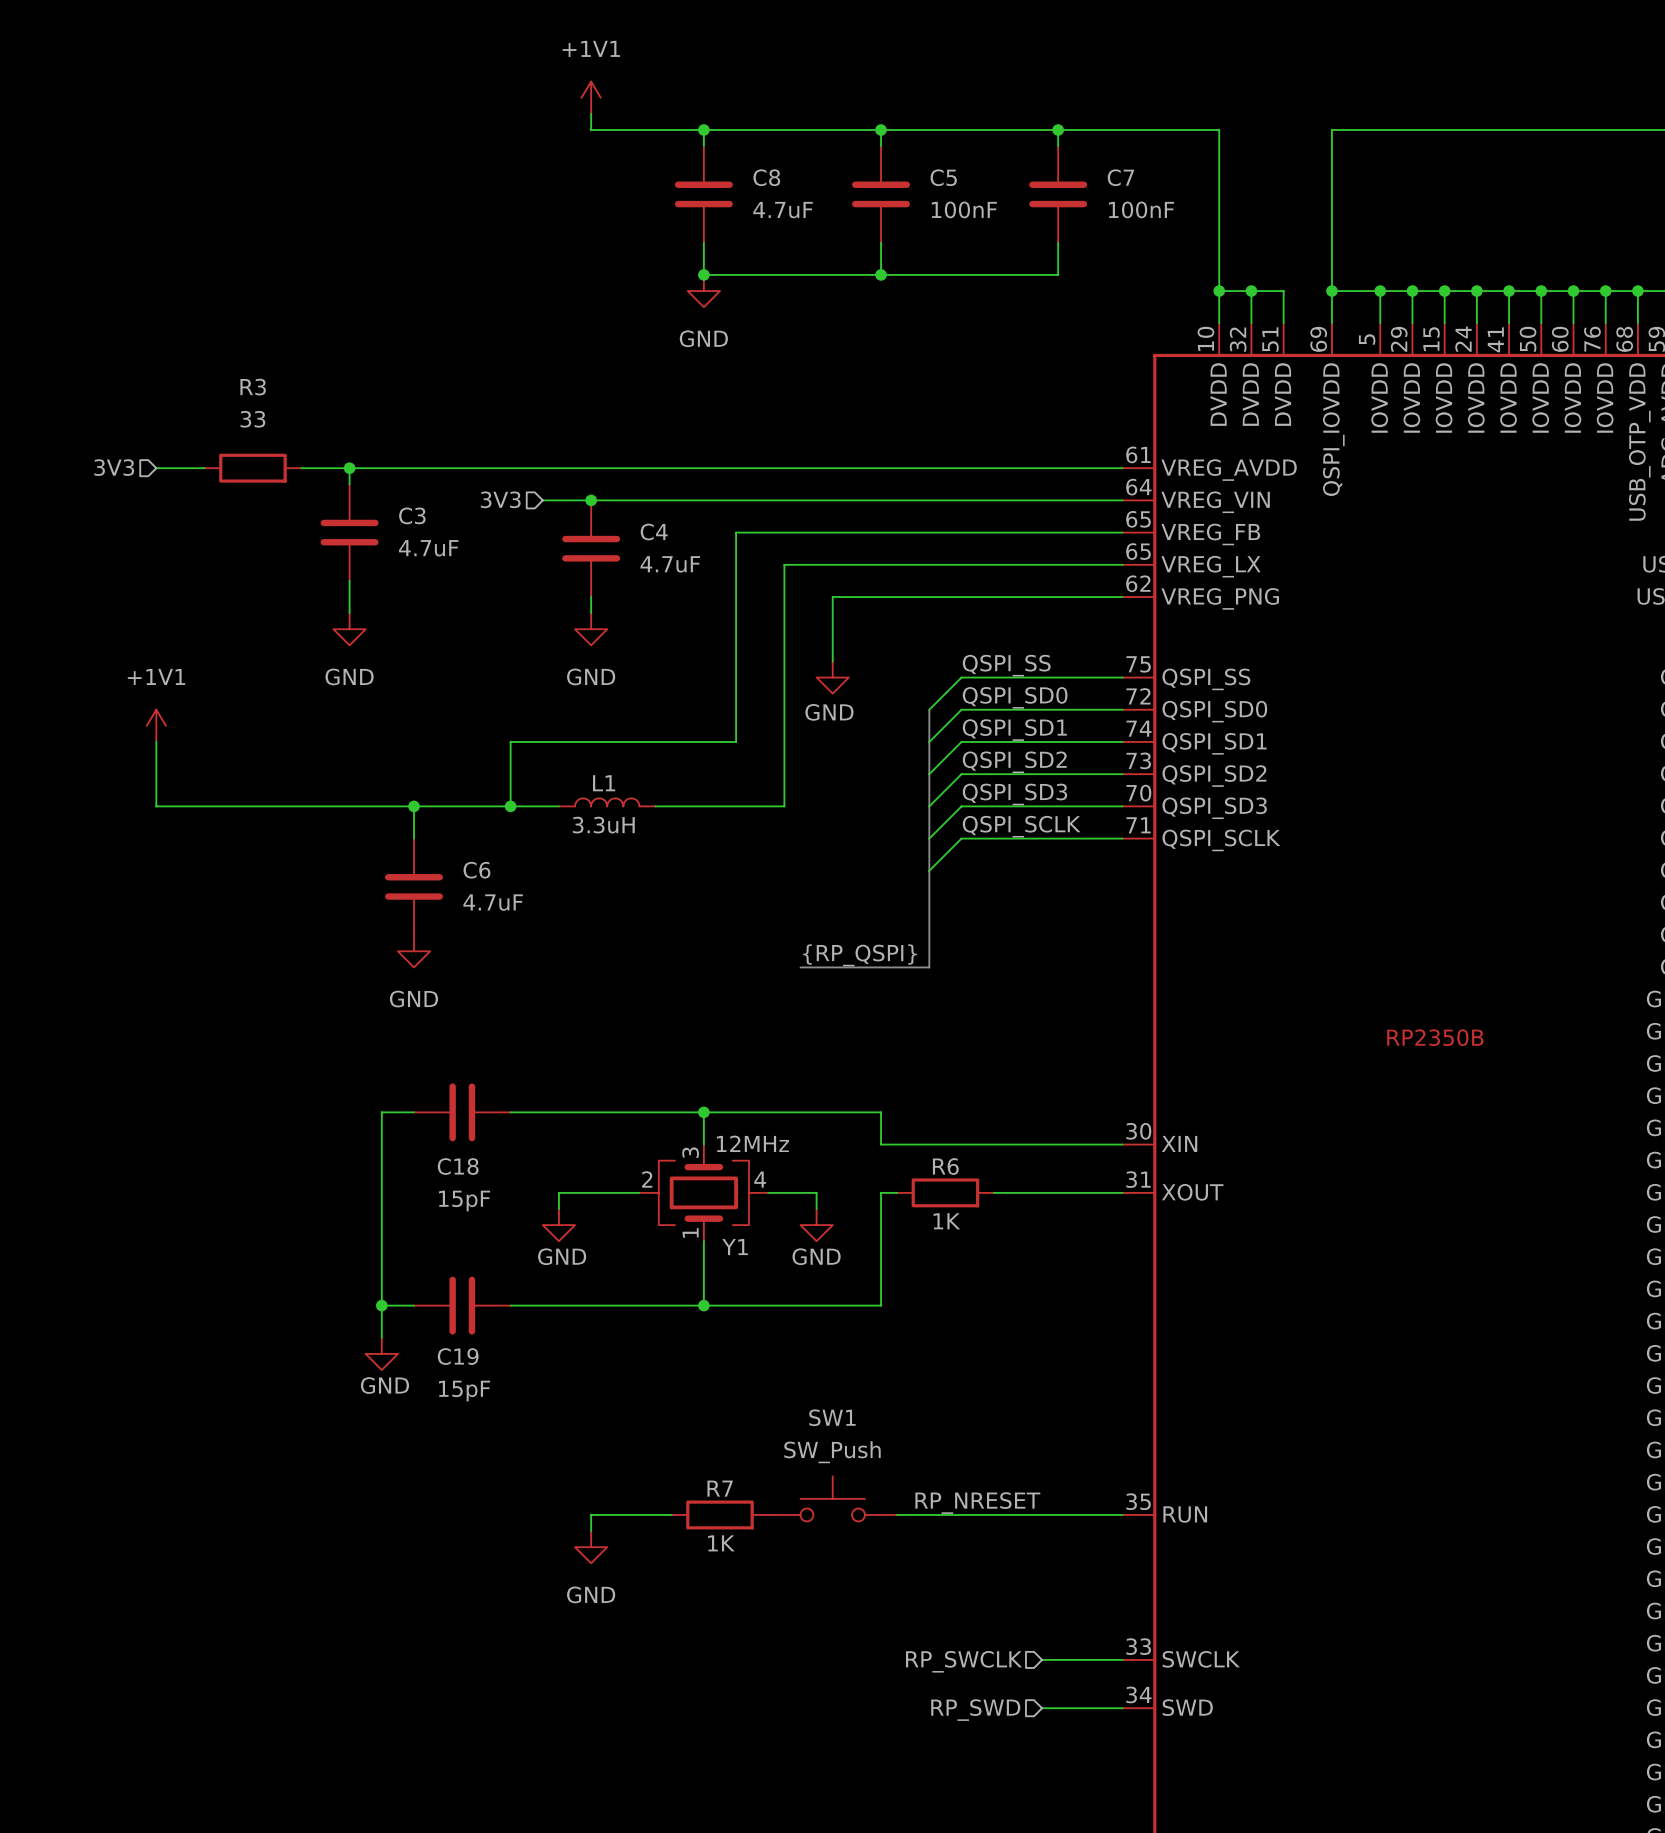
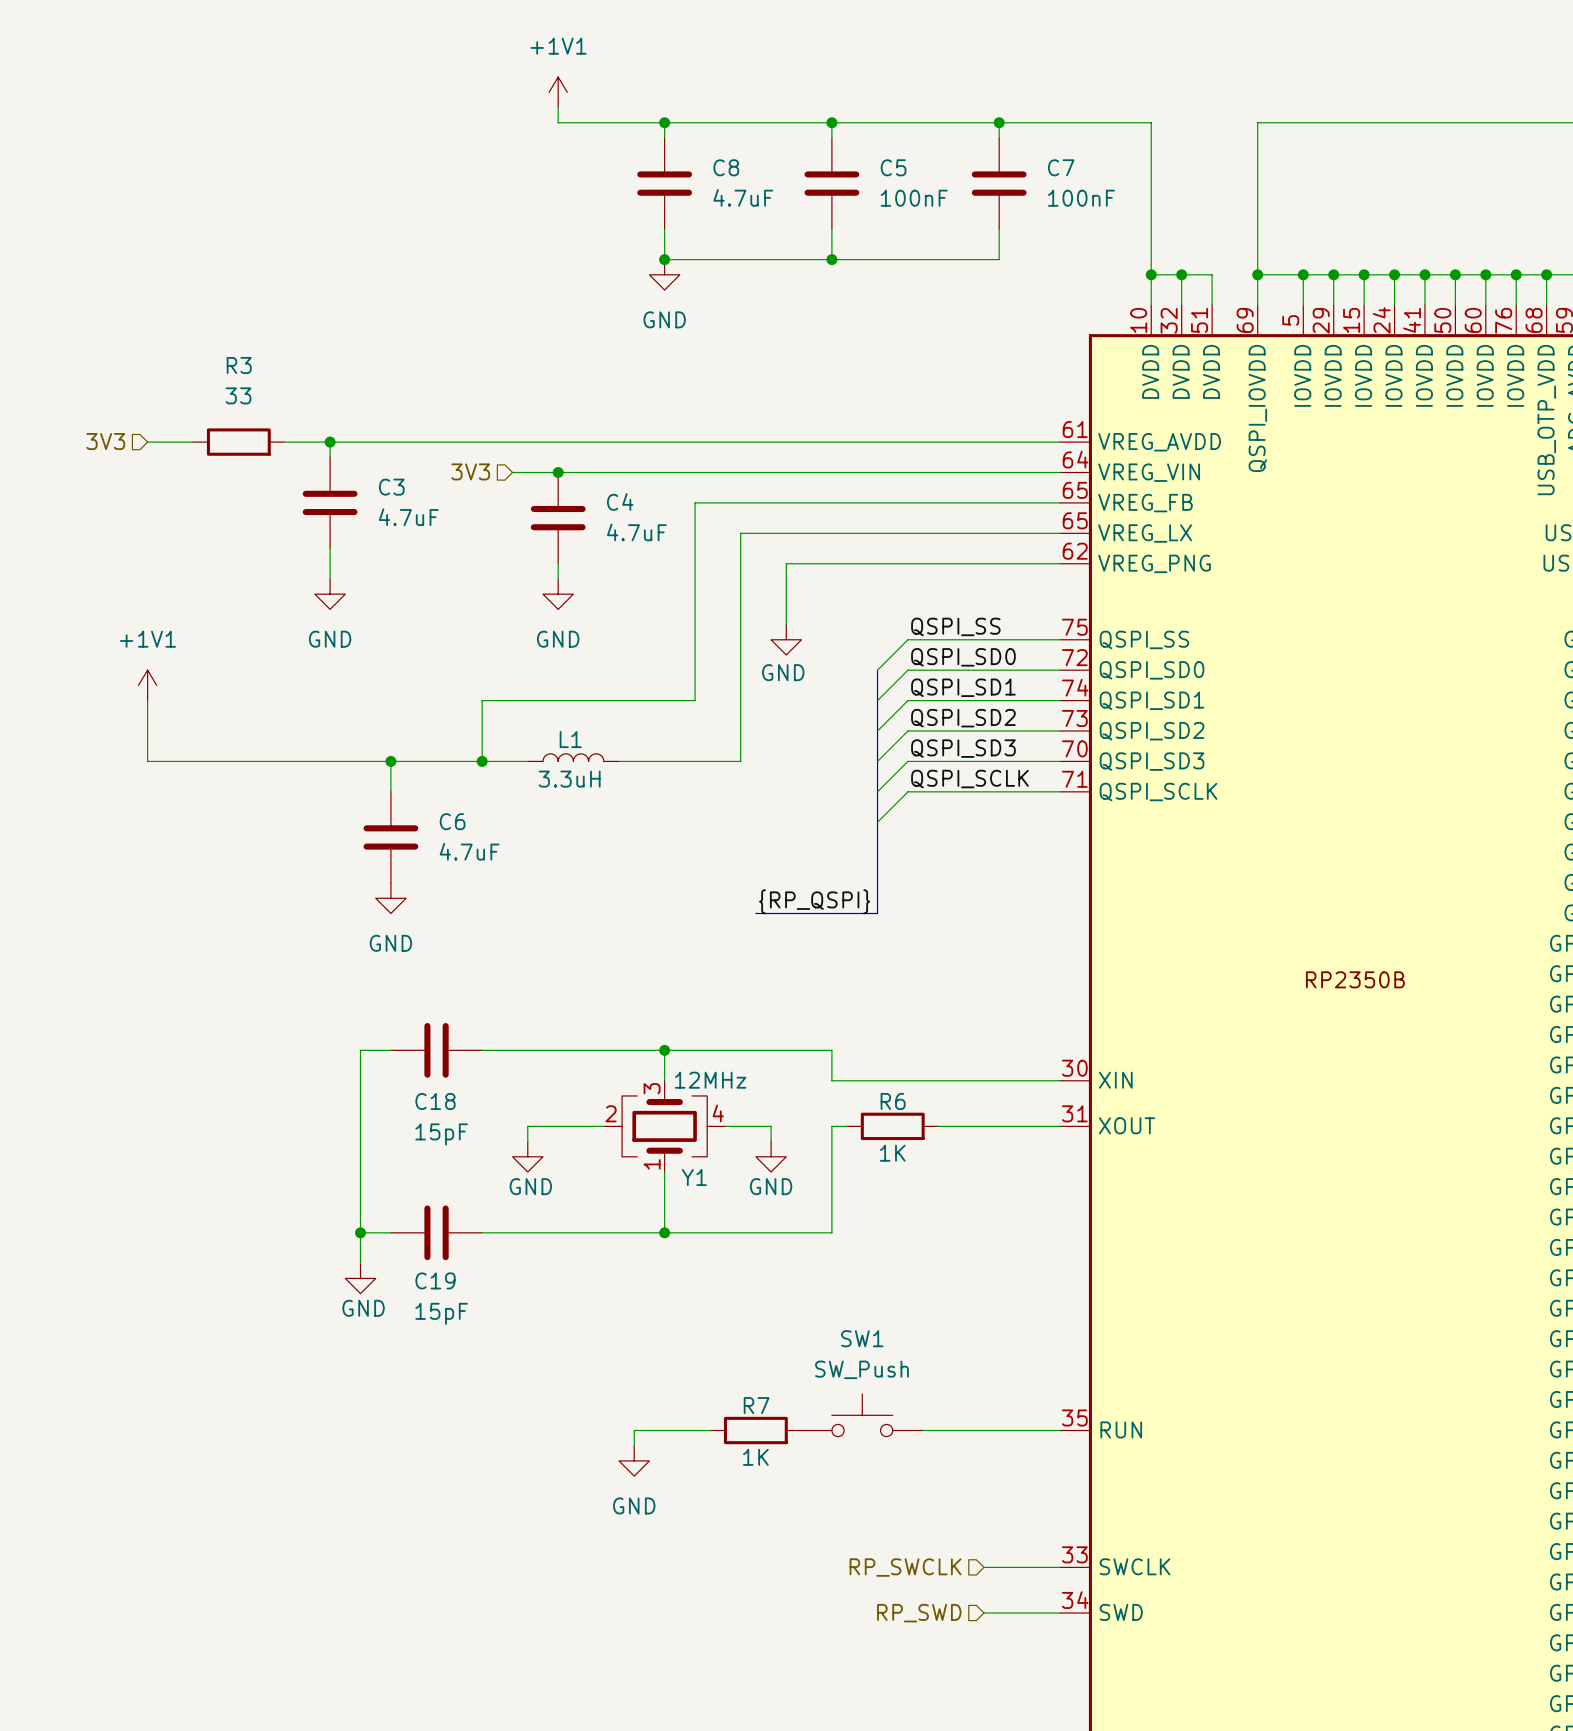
SW1 position: (832, 1498) -> (862, 1415)
label: RP_NRESET (977, 1503) -> none
wire: (671, 1514) (591, 1514) (591, 1531) -> (710, 1430) (634, 1430) (634, 1445)
R7 position: (719, 1514) -> (755, 1430)
wire: (897, 1514) (977, 1514) -> none
power symbol position: GND (591, 1547) -> GND (634, 1460)

